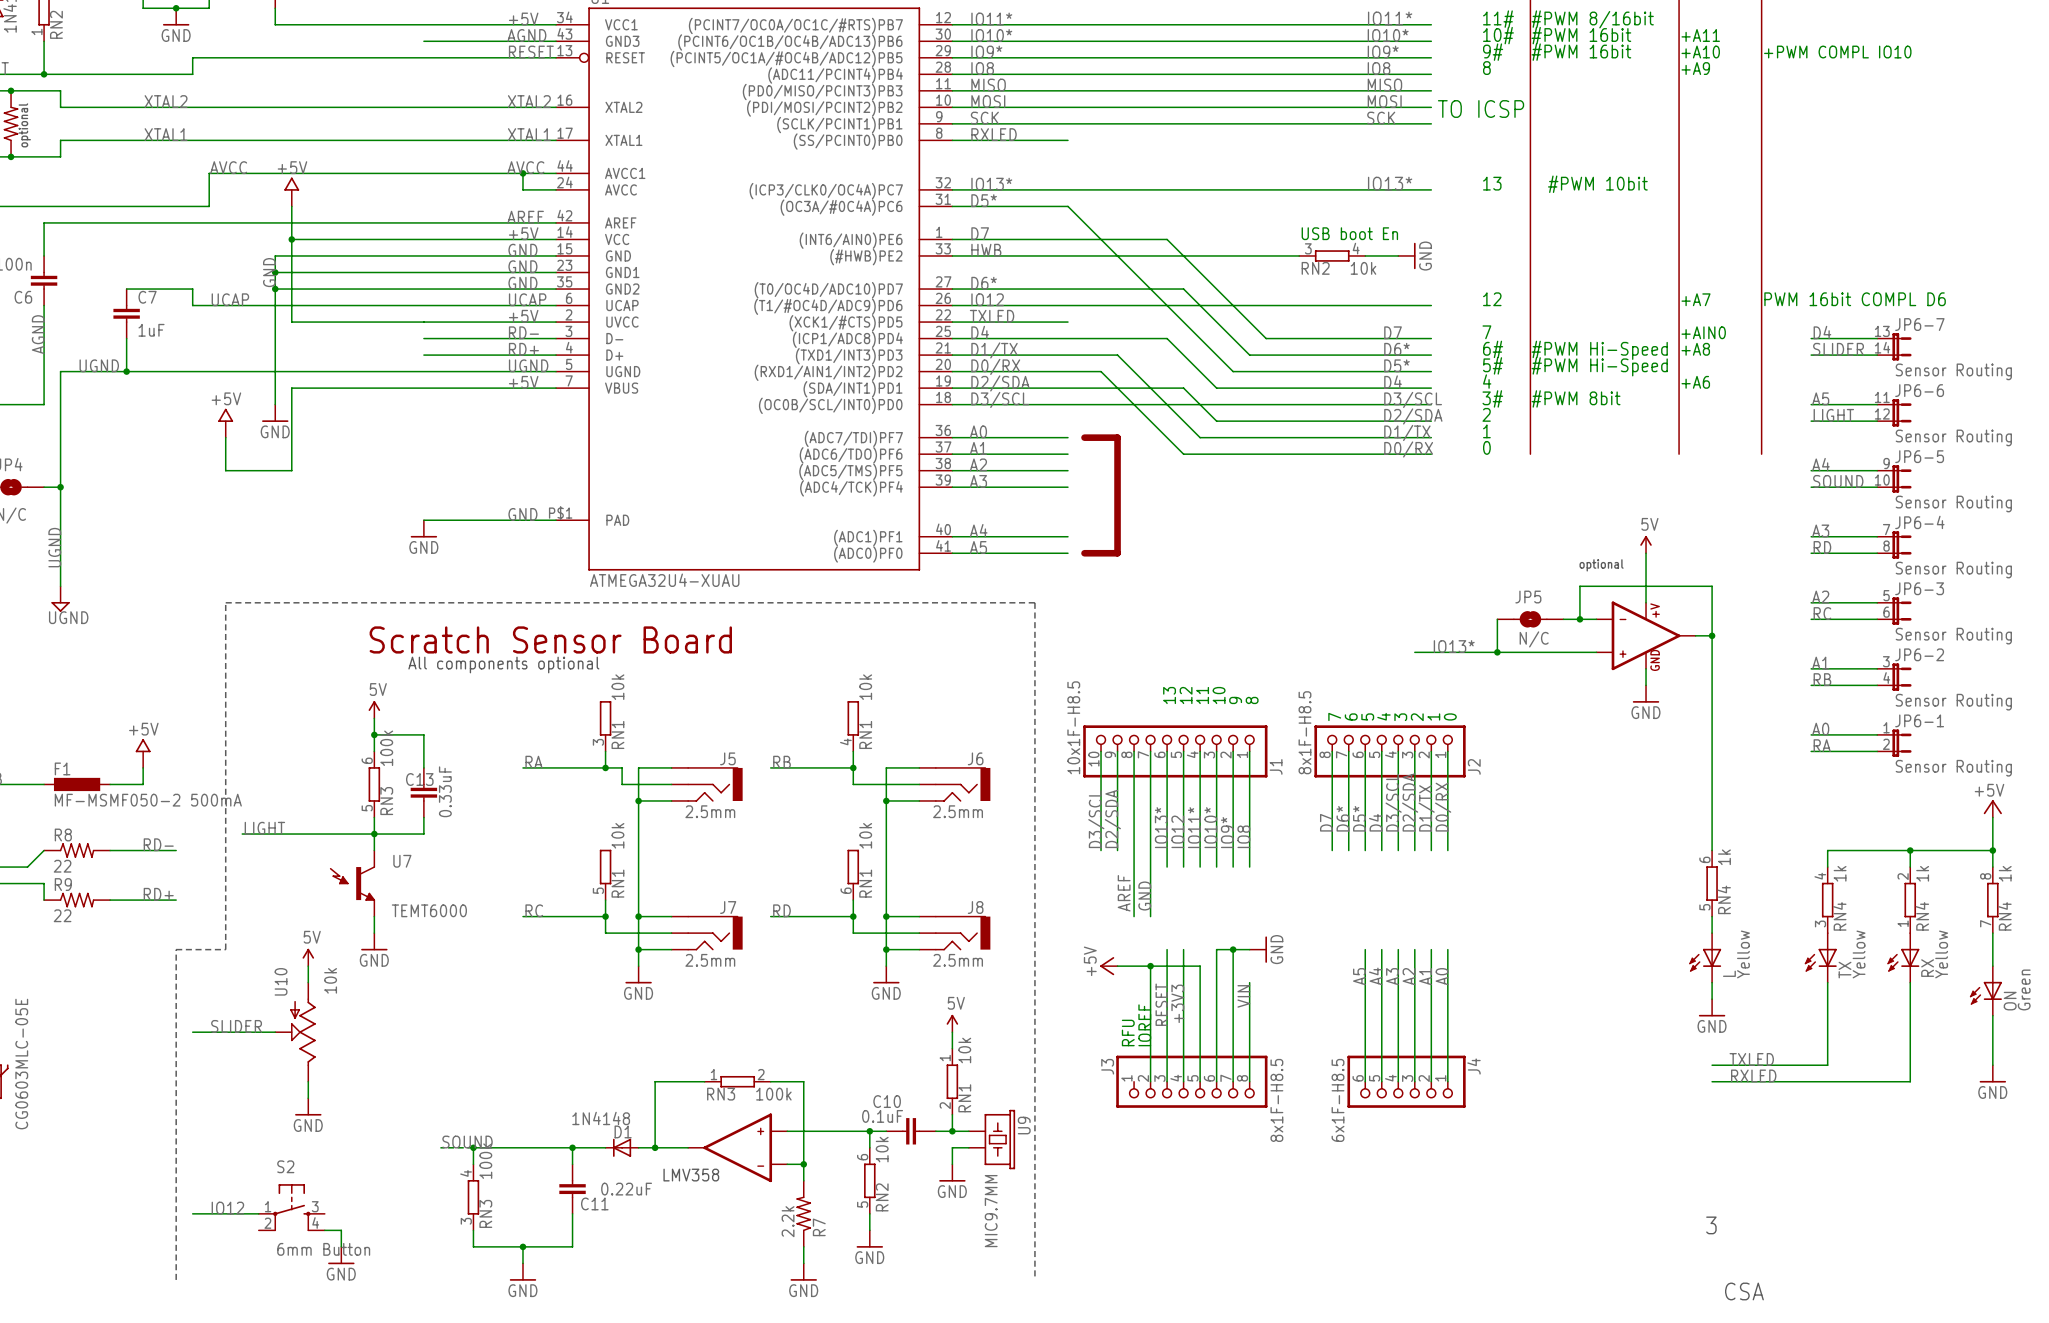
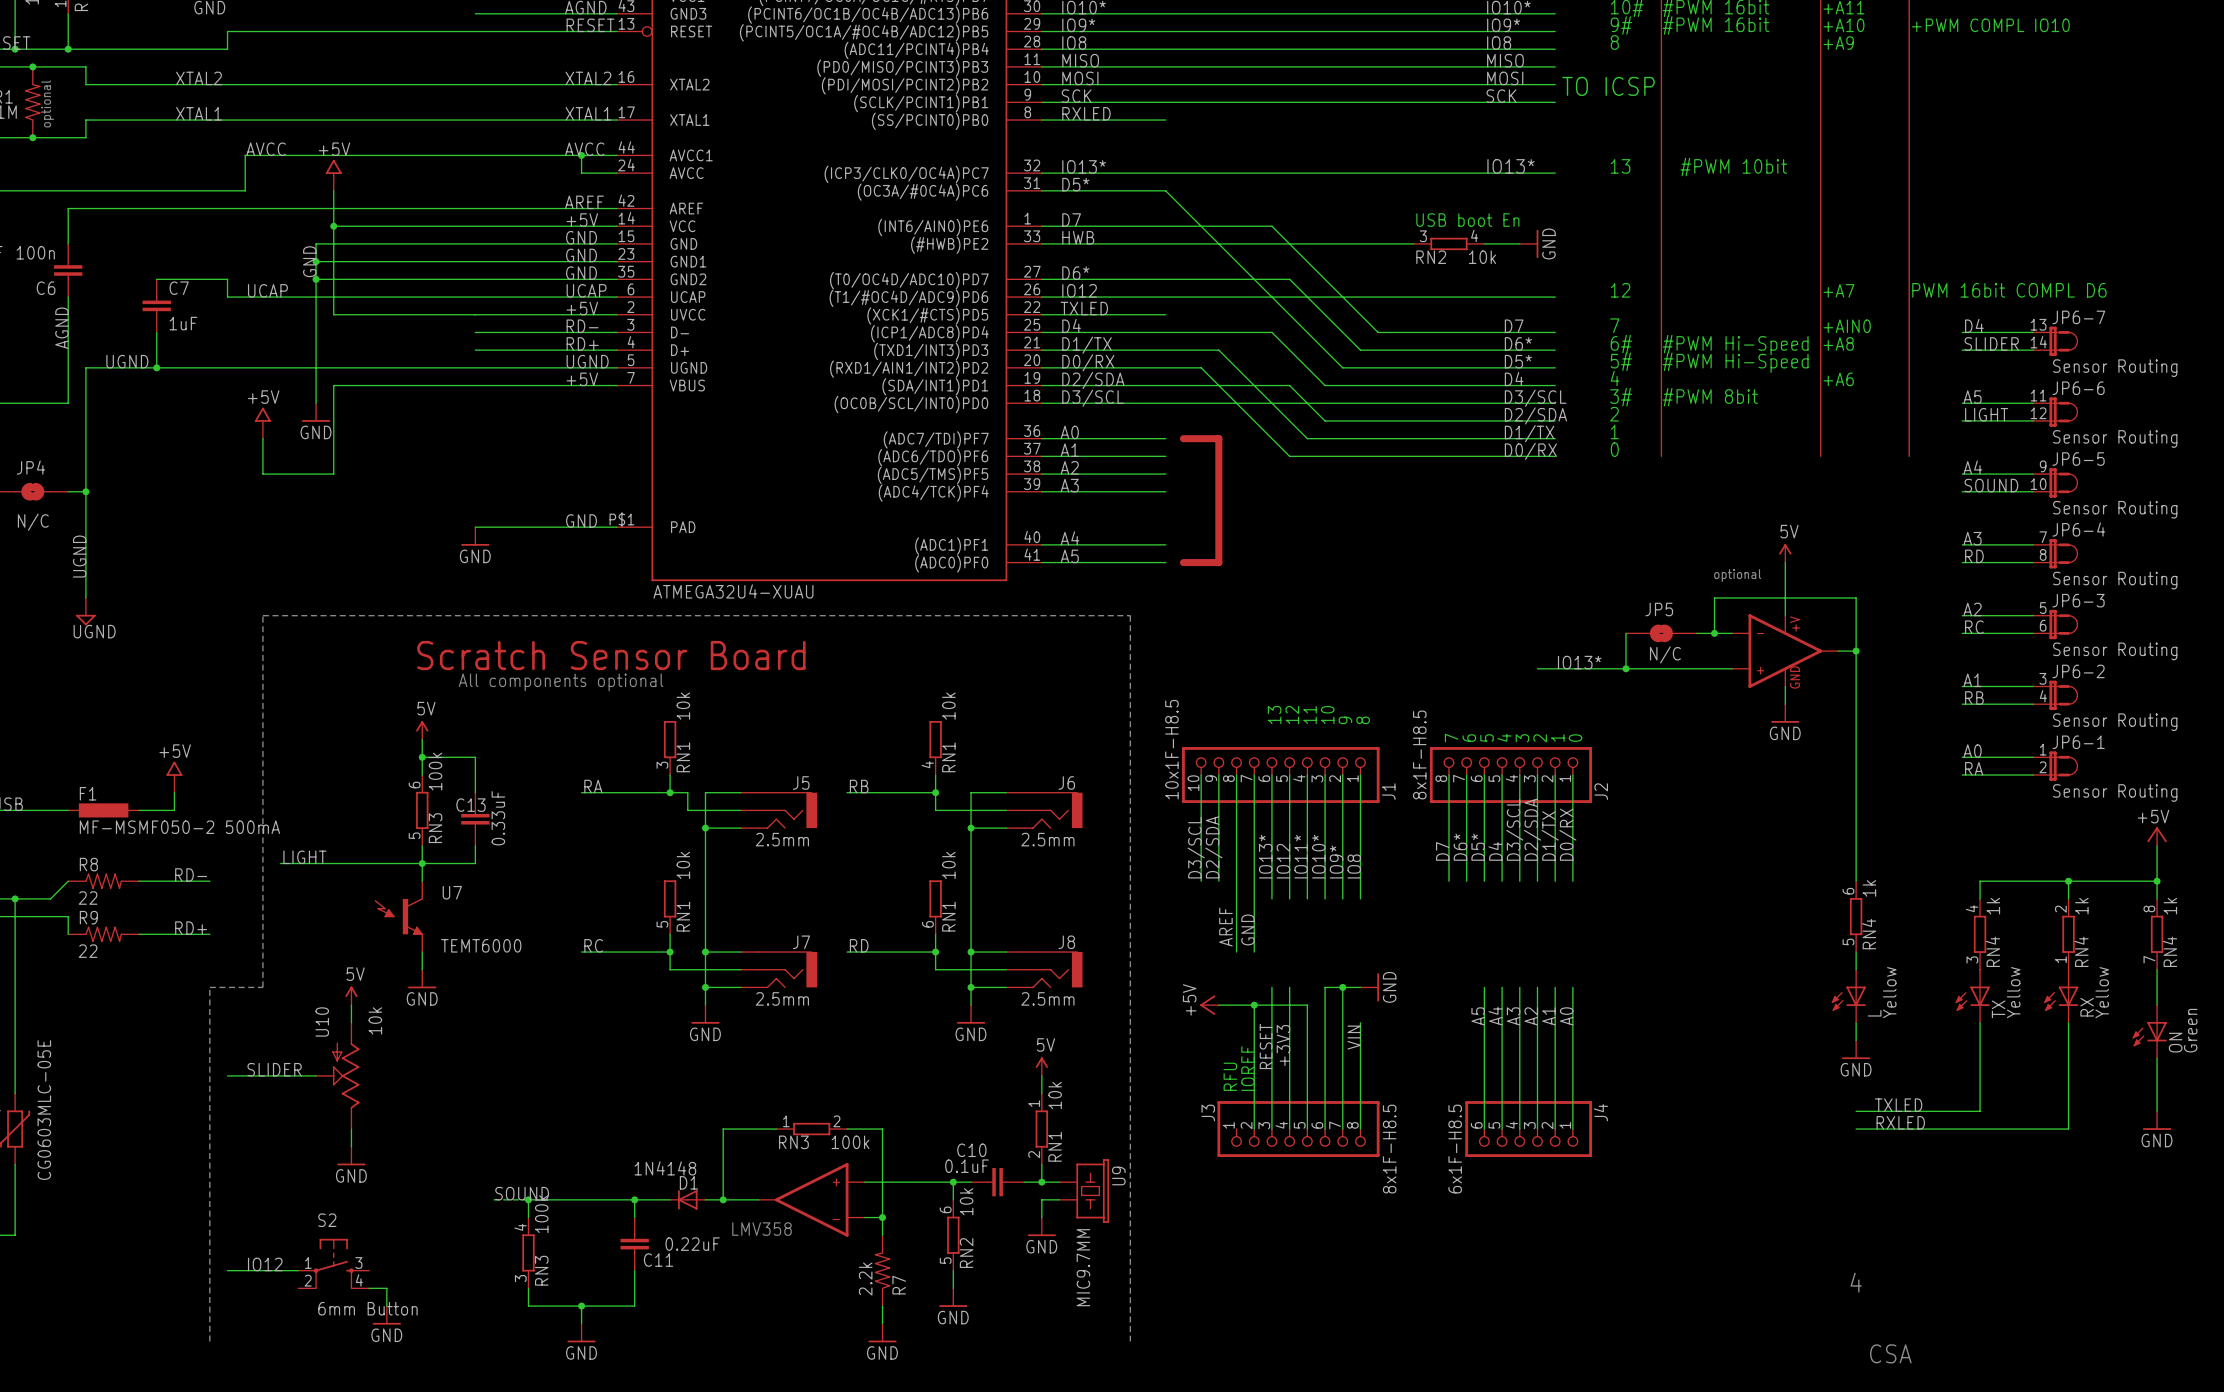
JP6-7 symbol: [1877, 333, 1912, 361] -> [2033, 326, 2078, 356]
JP6-6 symbol: [1877, 399, 1912, 427] -> [2033, 397, 2078, 427]
JP6-5 symbol: [1877, 465, 1912, 493] -> [2033, 468, 2078, 498]
JP6-4 symbol: [1877, 531, 1912, 559] -> [2033, 539, 2078, 569]
JP6-3 symbol: [1877, 597, 1912, 625] -> [2033, 609, 2078, 640]
JP6-2 symbol: [1877, 663, 1912, 691] -> [2033, 680, 2078, 711]
JP6-1 symbol: [1877, 729, 1912, 757] -> [2033, 751, 2078, 781]
text: 3 (1711, 1225) -> 4 (1856, 1282)

